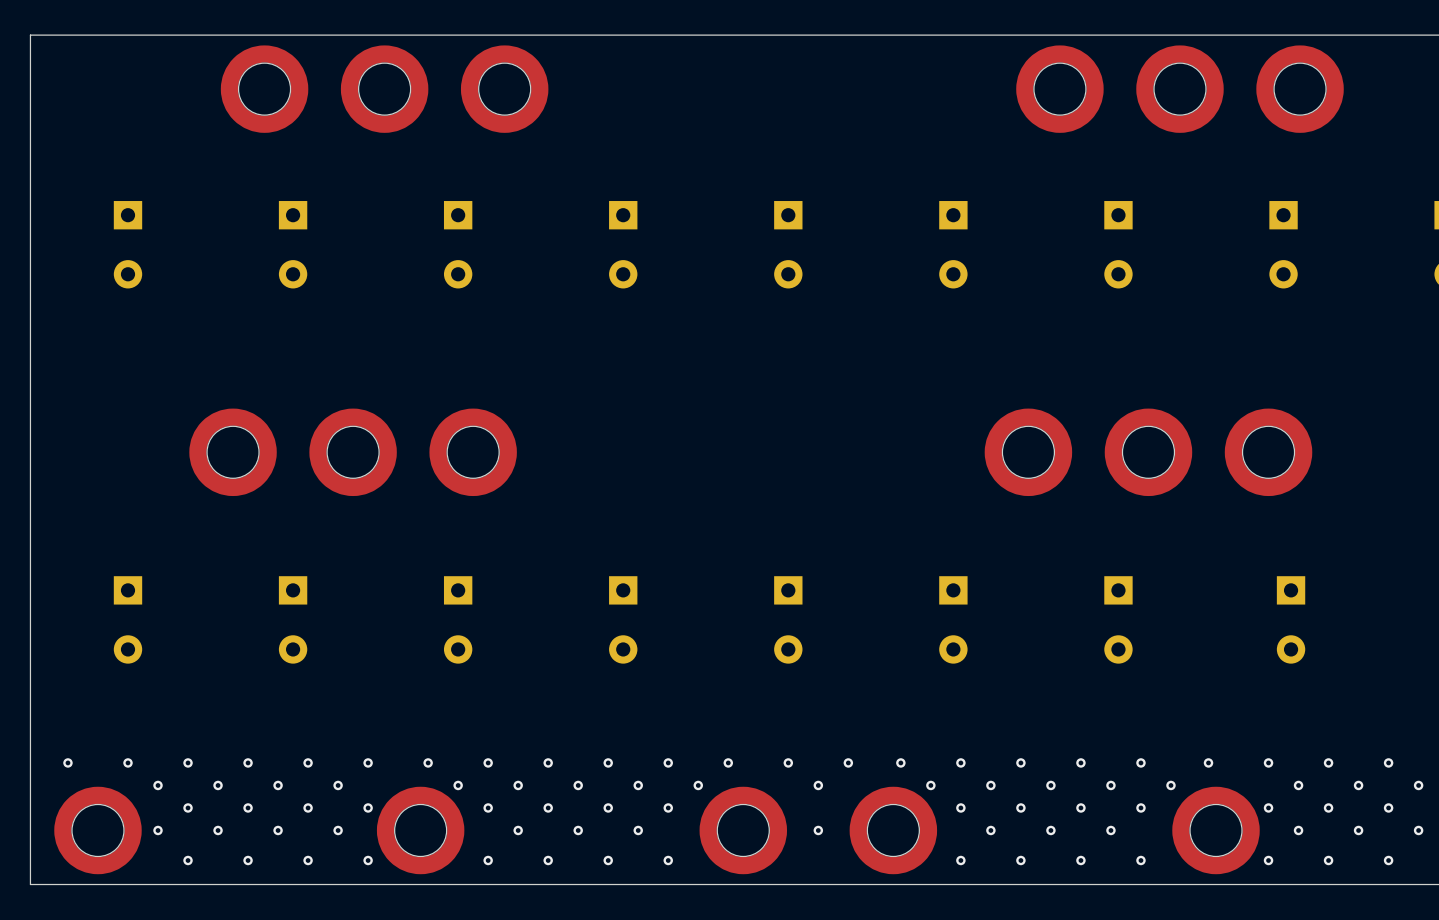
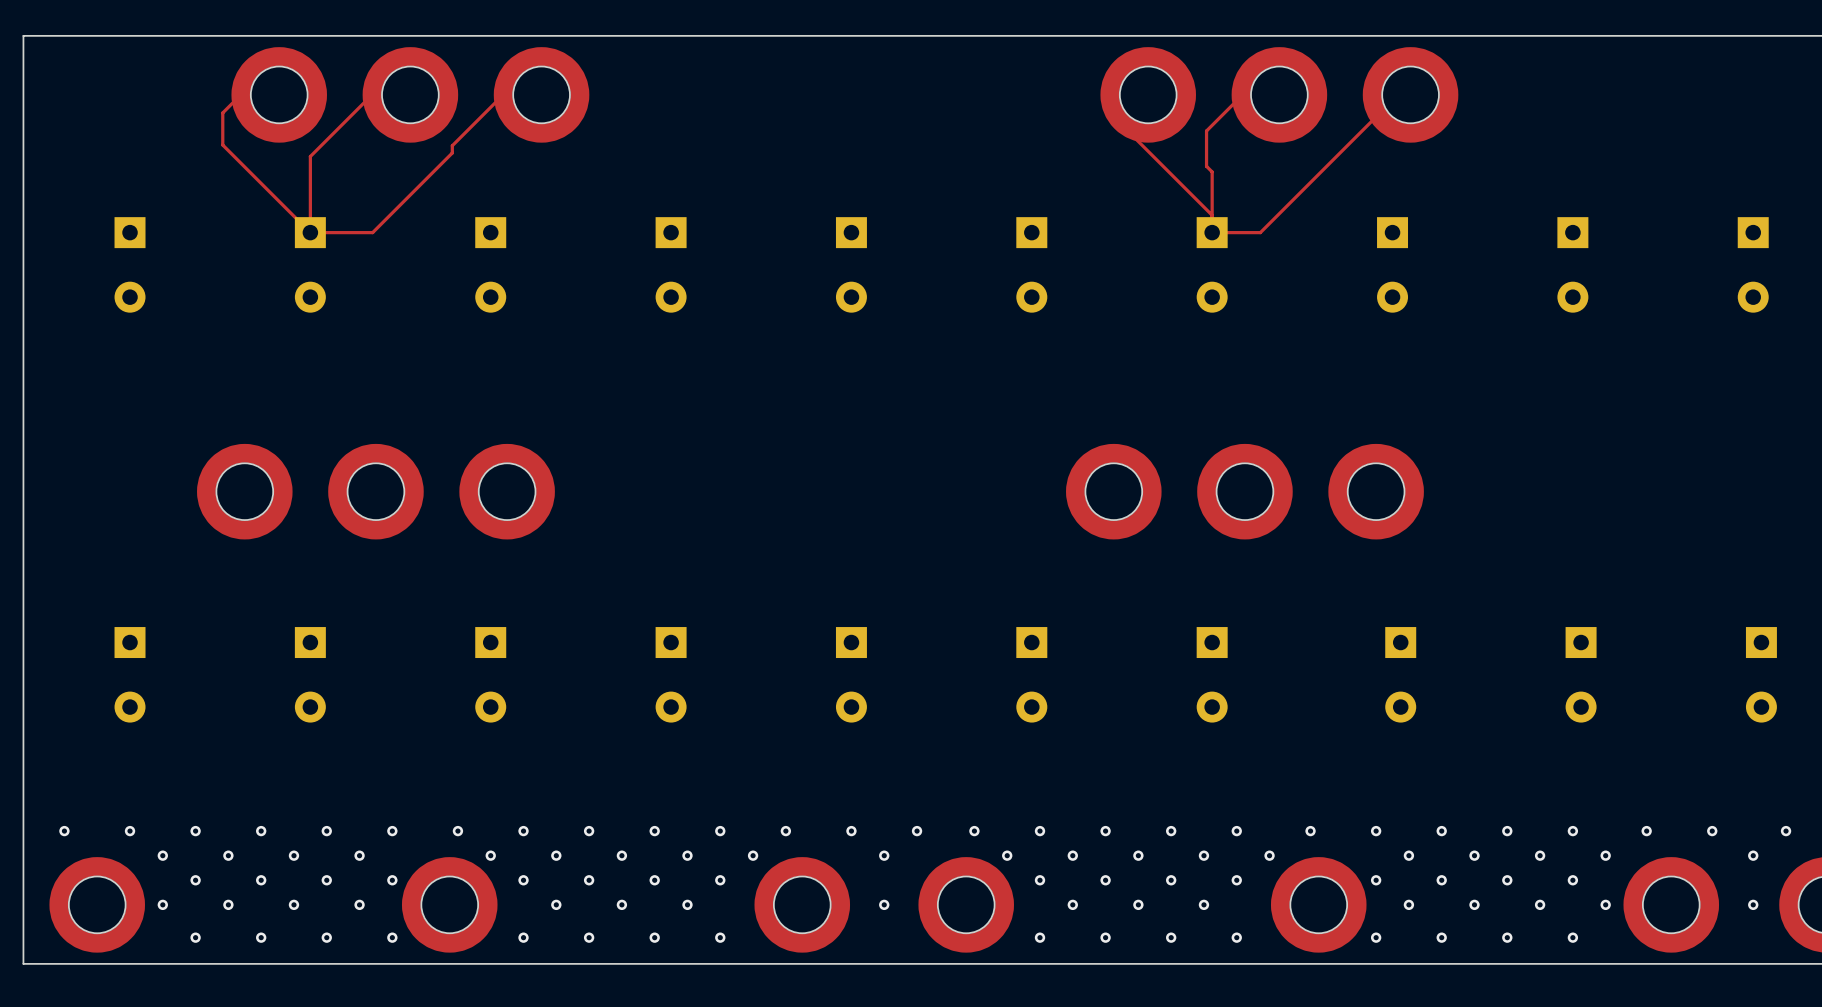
top track: none -> (240, 94) (222, 112) (222, 145) (310, 232)
top track: none -> (371, 94) (310, 156) (310, 232)
top track: none -> (503, 94) (452, 145) (452, 152) (372, 232) (310, 232)
top track: none -> (1242, 94) (1206, 130) (1206, 166) (1212, 171) (1212, 232) (1260, 232) (1373, 119)
top track: none -> (1130, 133) (1212, 215)

